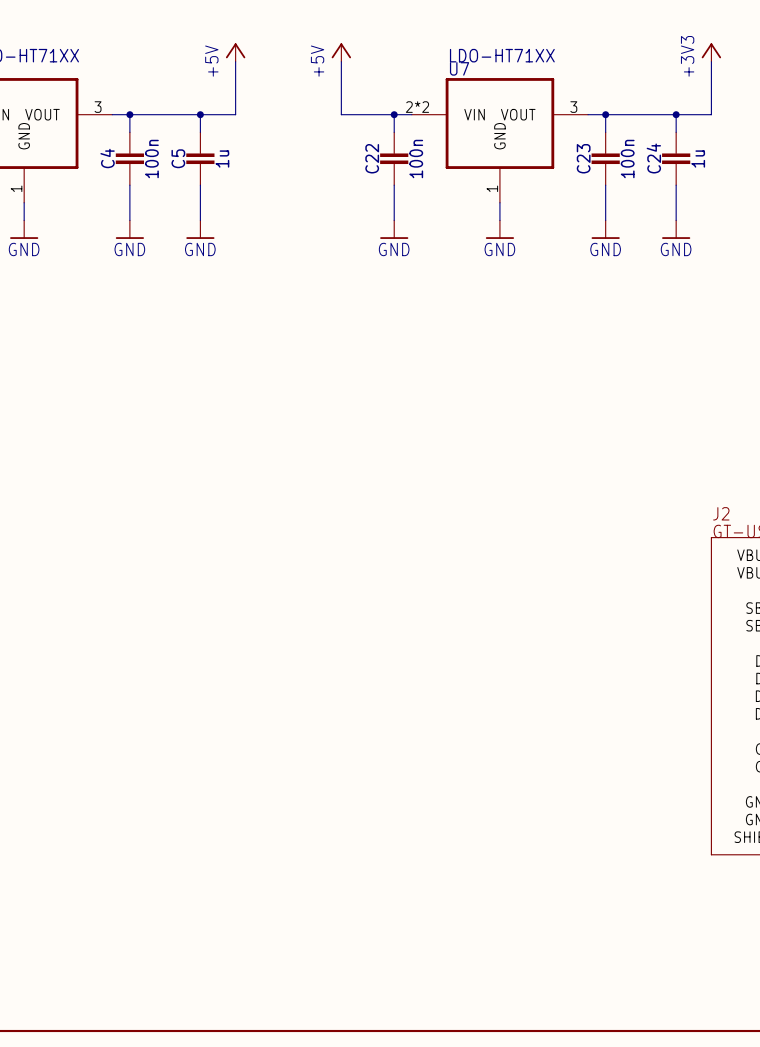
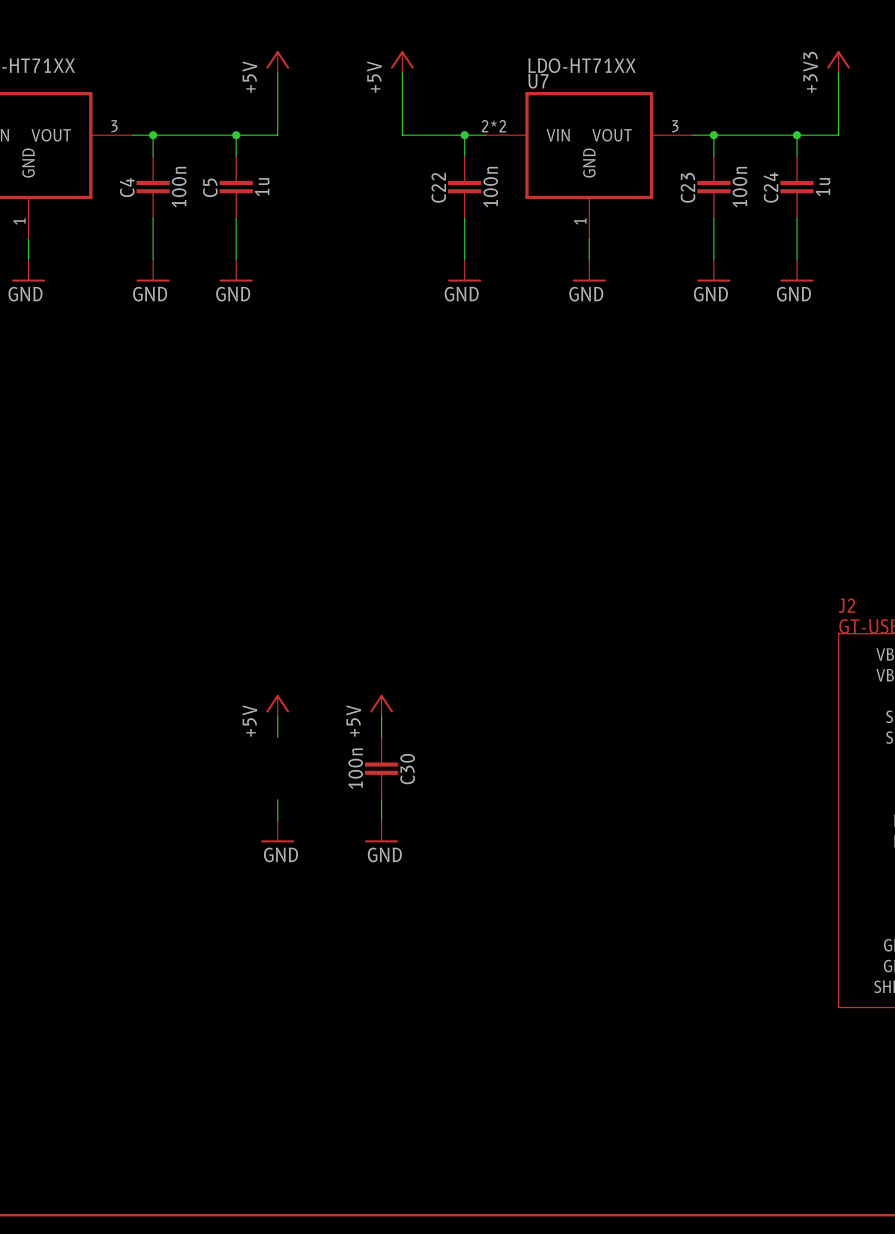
power symbol: none -> +5V (277, 705)
power symbol: none -> +5V (381, 705)
wire: none -> (277, 716) (277, 737)
wire: none -> (381, 716) (381, 737)
C30: none -> 100n (381, 768)
wire: none -> (277, 799) (277, 820)
wire: none -> (381, 799) (381, 820)
power symbol: none -> GND (277, 831)
power symbol: none -> GND (381, 831)

